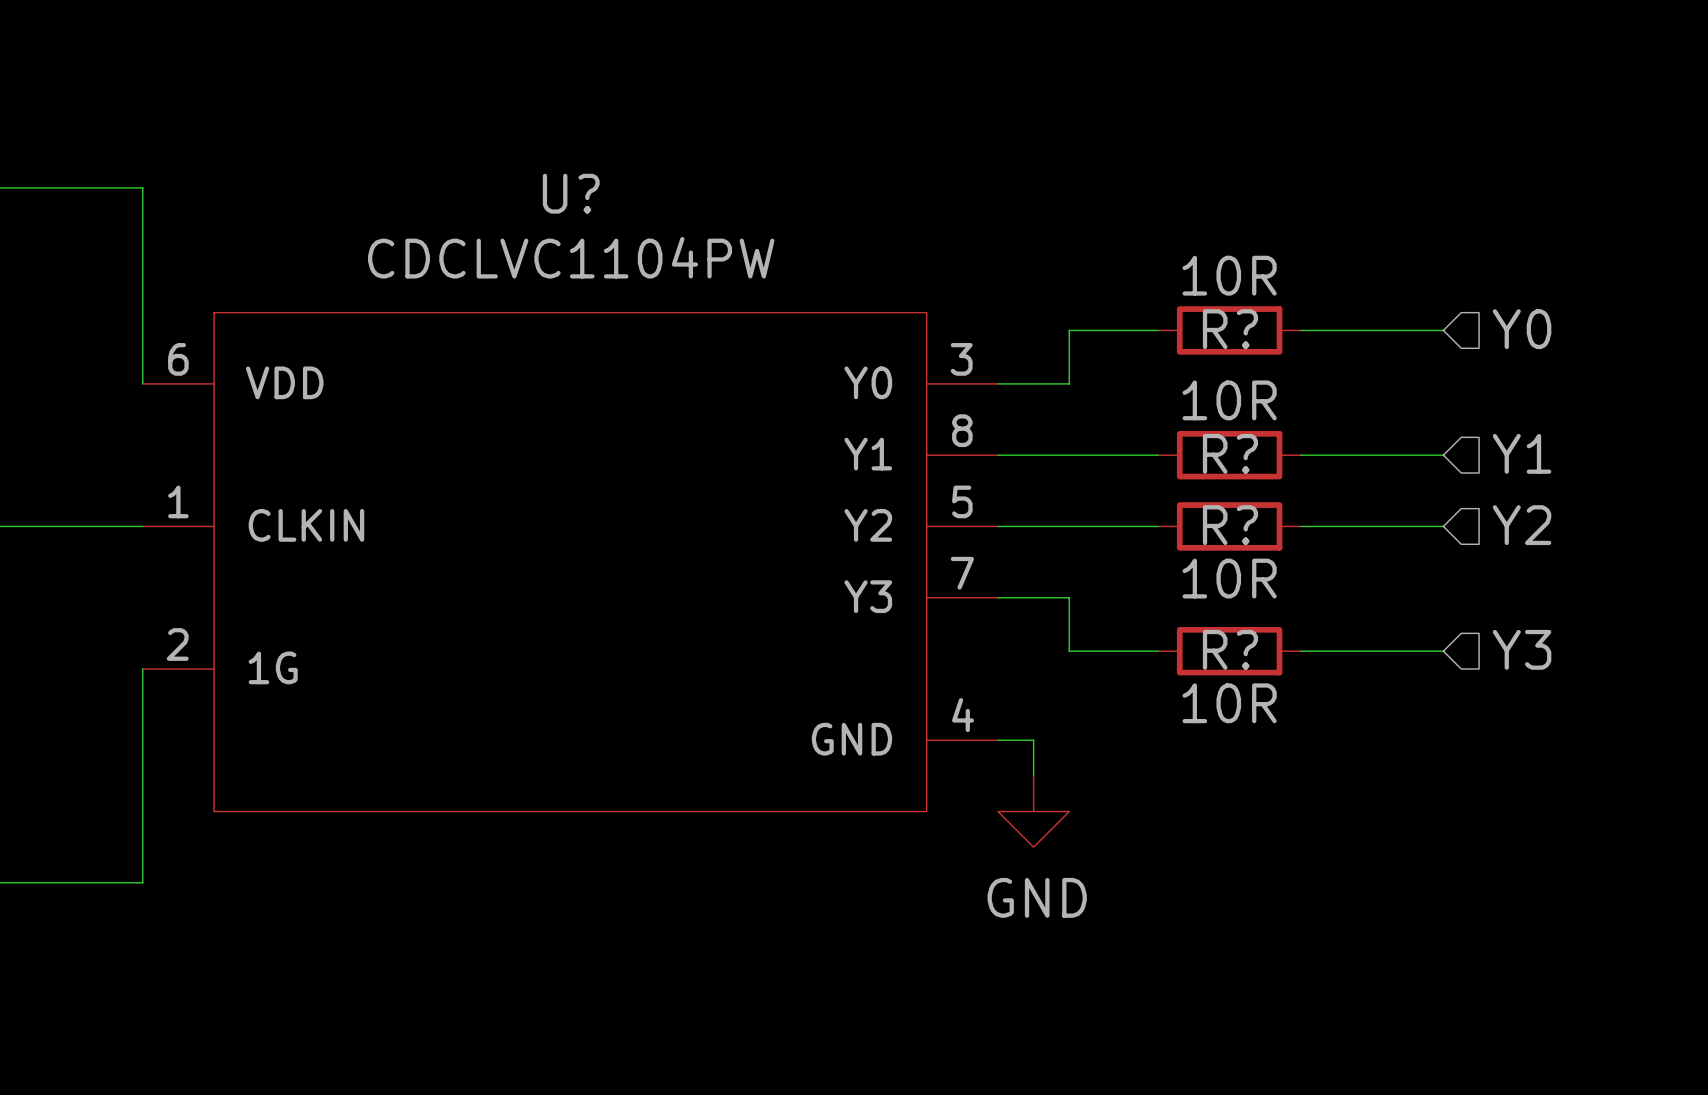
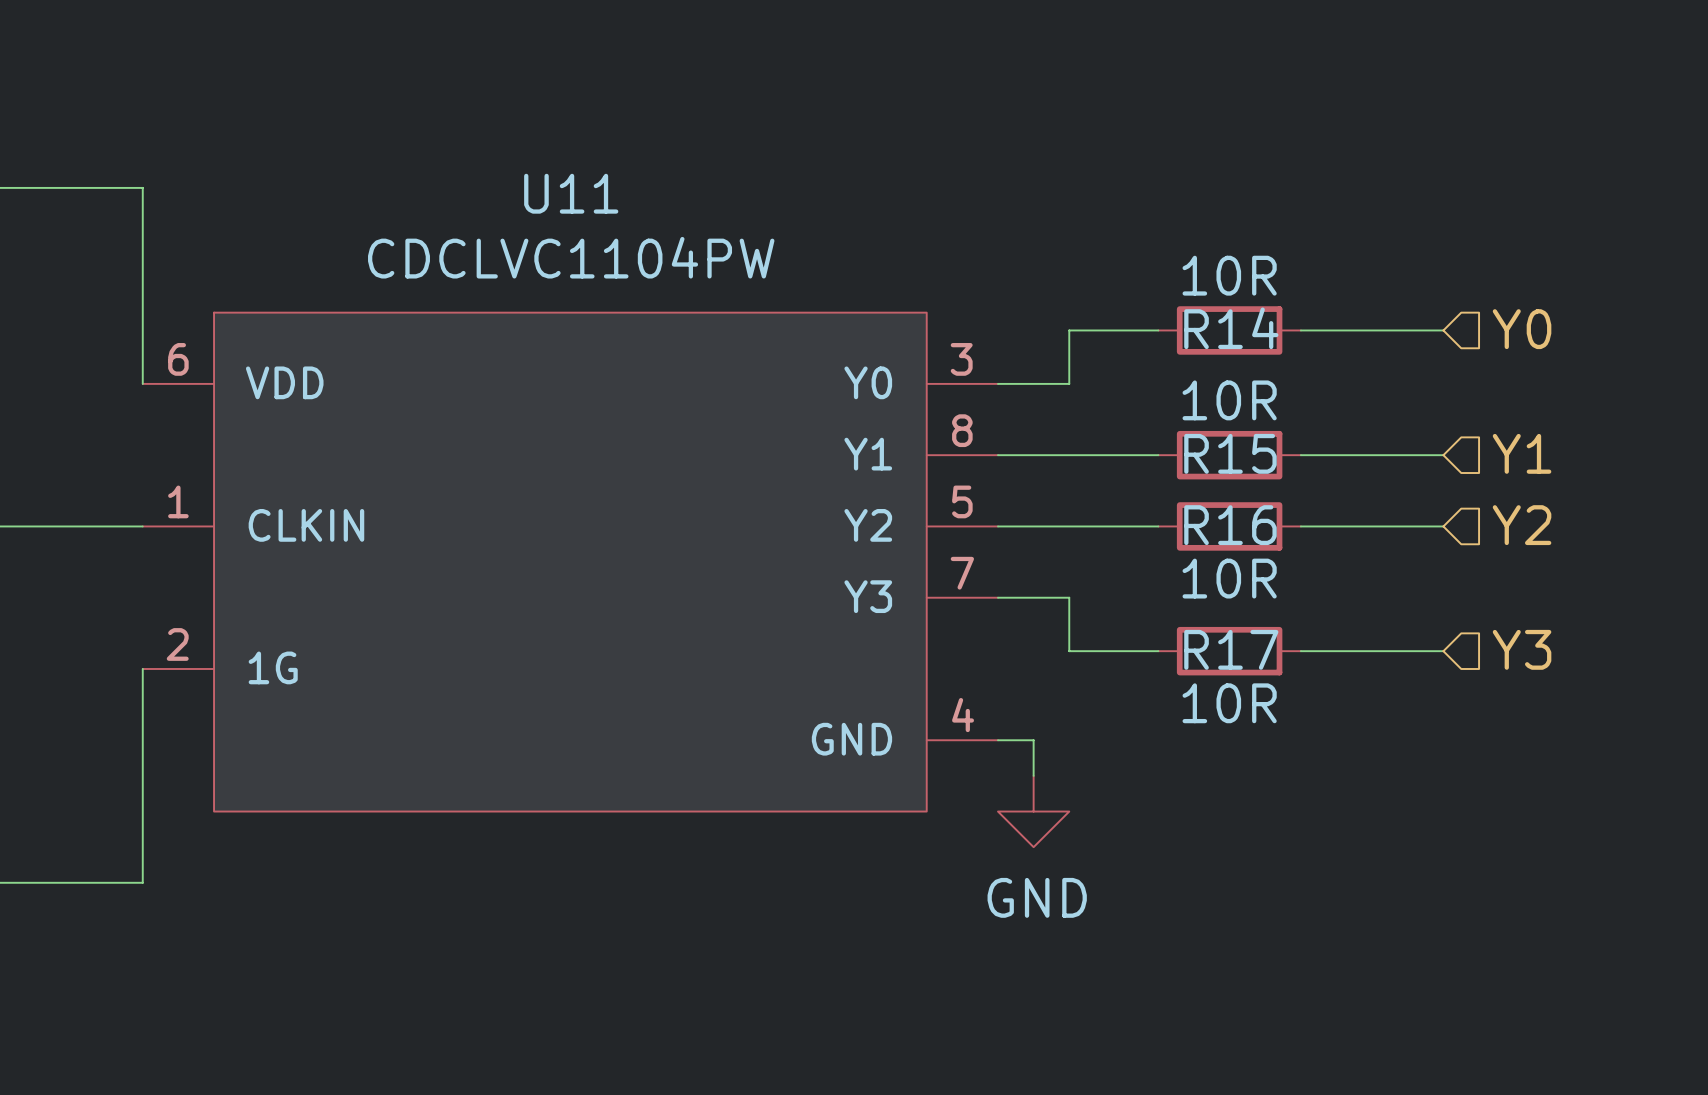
U? name: U? (571, 193) -> U11 (571, 193)
R? name: R? (1230, 329) -> R14 (1231, 328)
R? name: R? (1230, 453) -> R15 (1230, 453)
R? name: R? (1230, 525) -> R16 (1230, 525)
R? name: R? (1230, 649) -> R17 (1231, 649)

